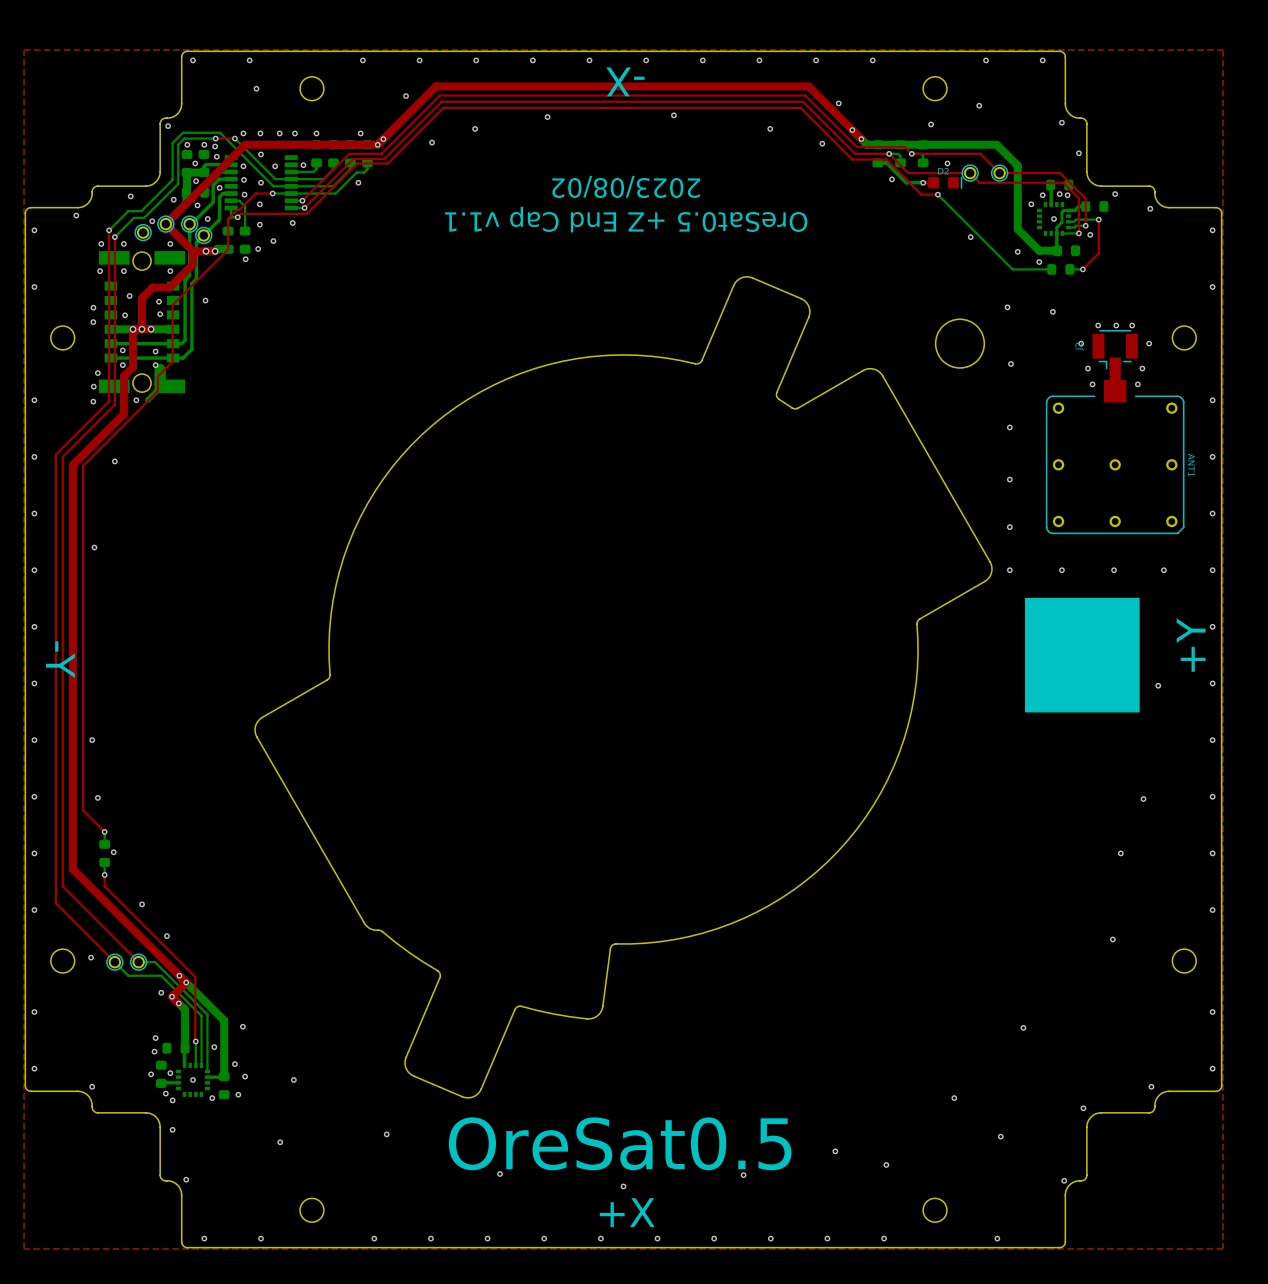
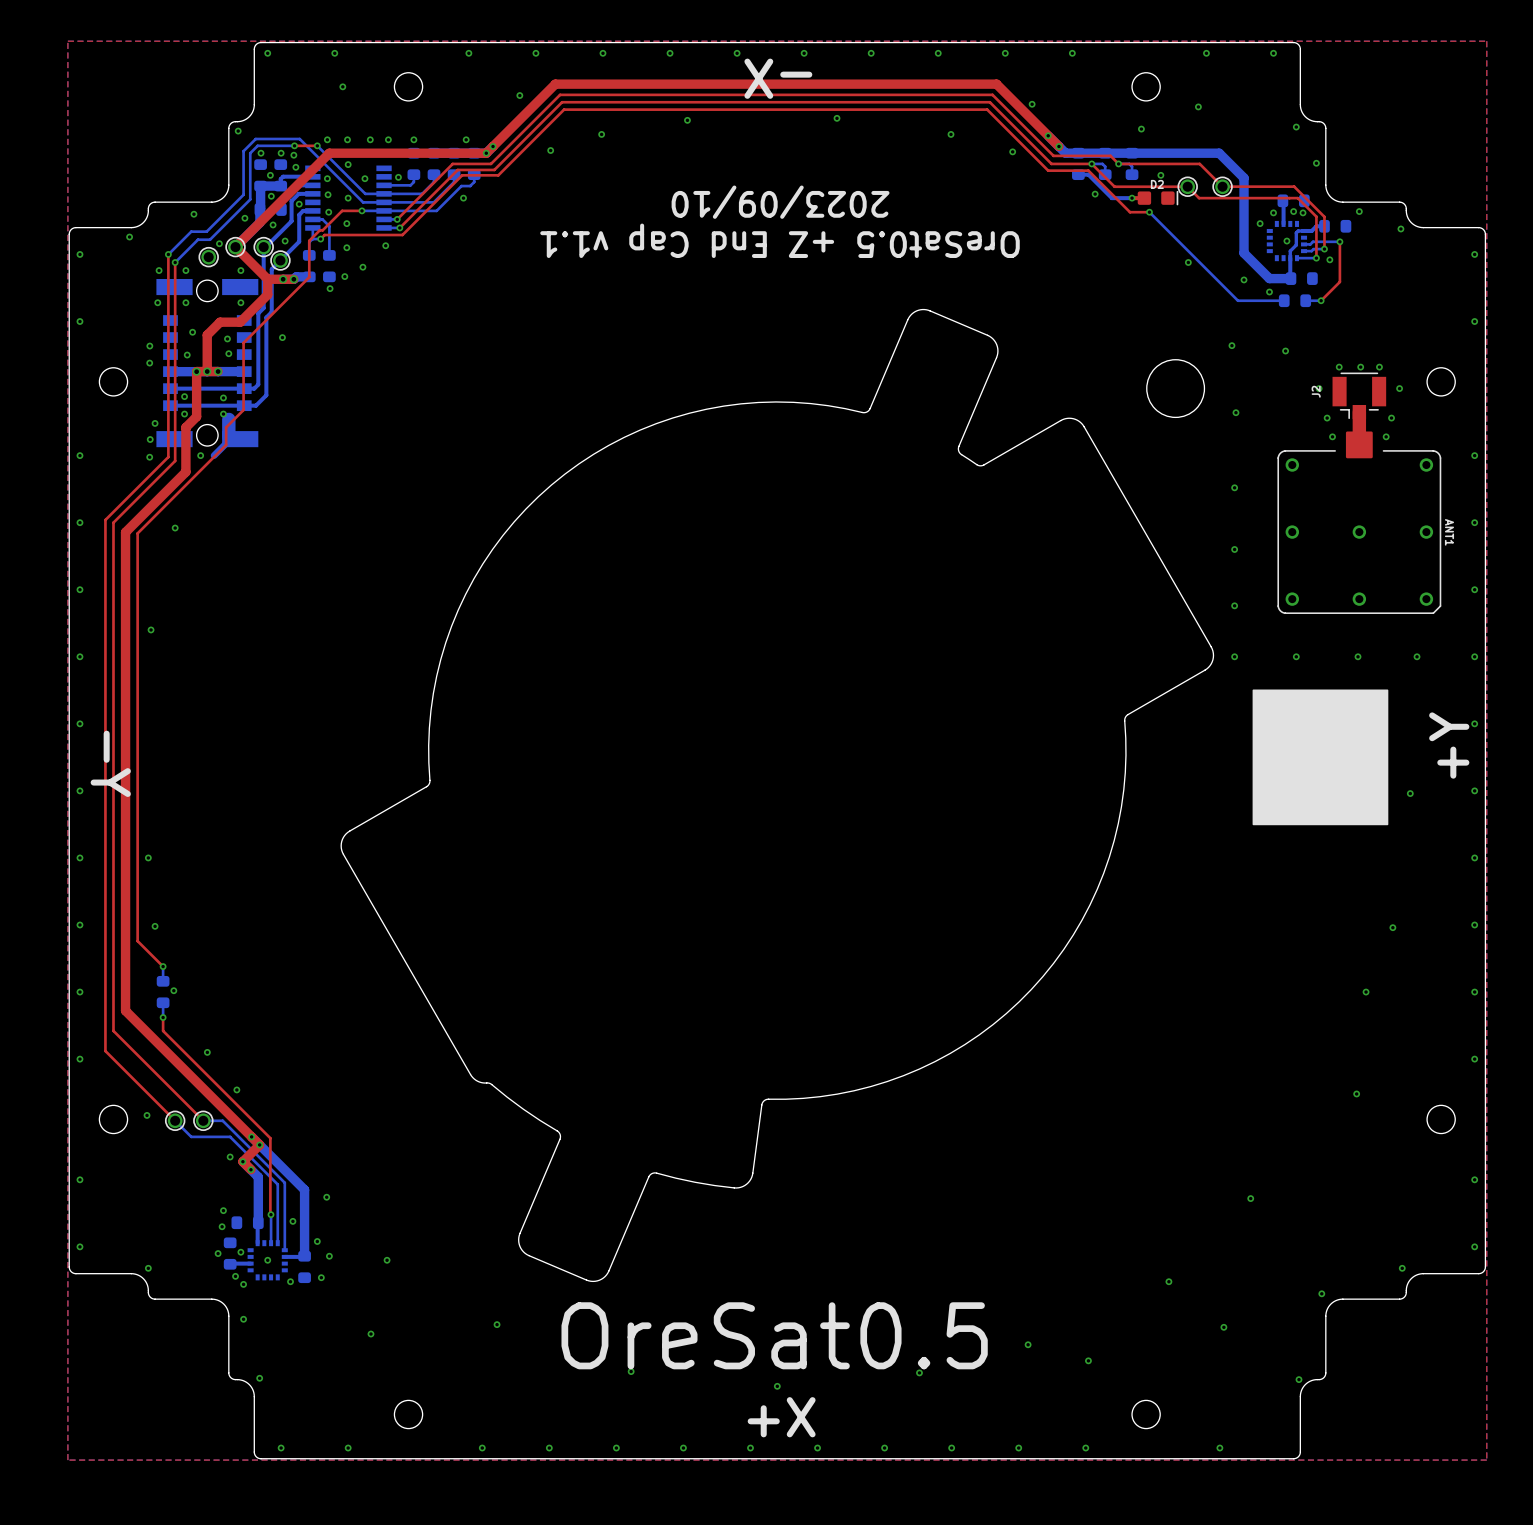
text: 2023/08/02 (626, 186) -> 2023/09/10 (780, 202)

